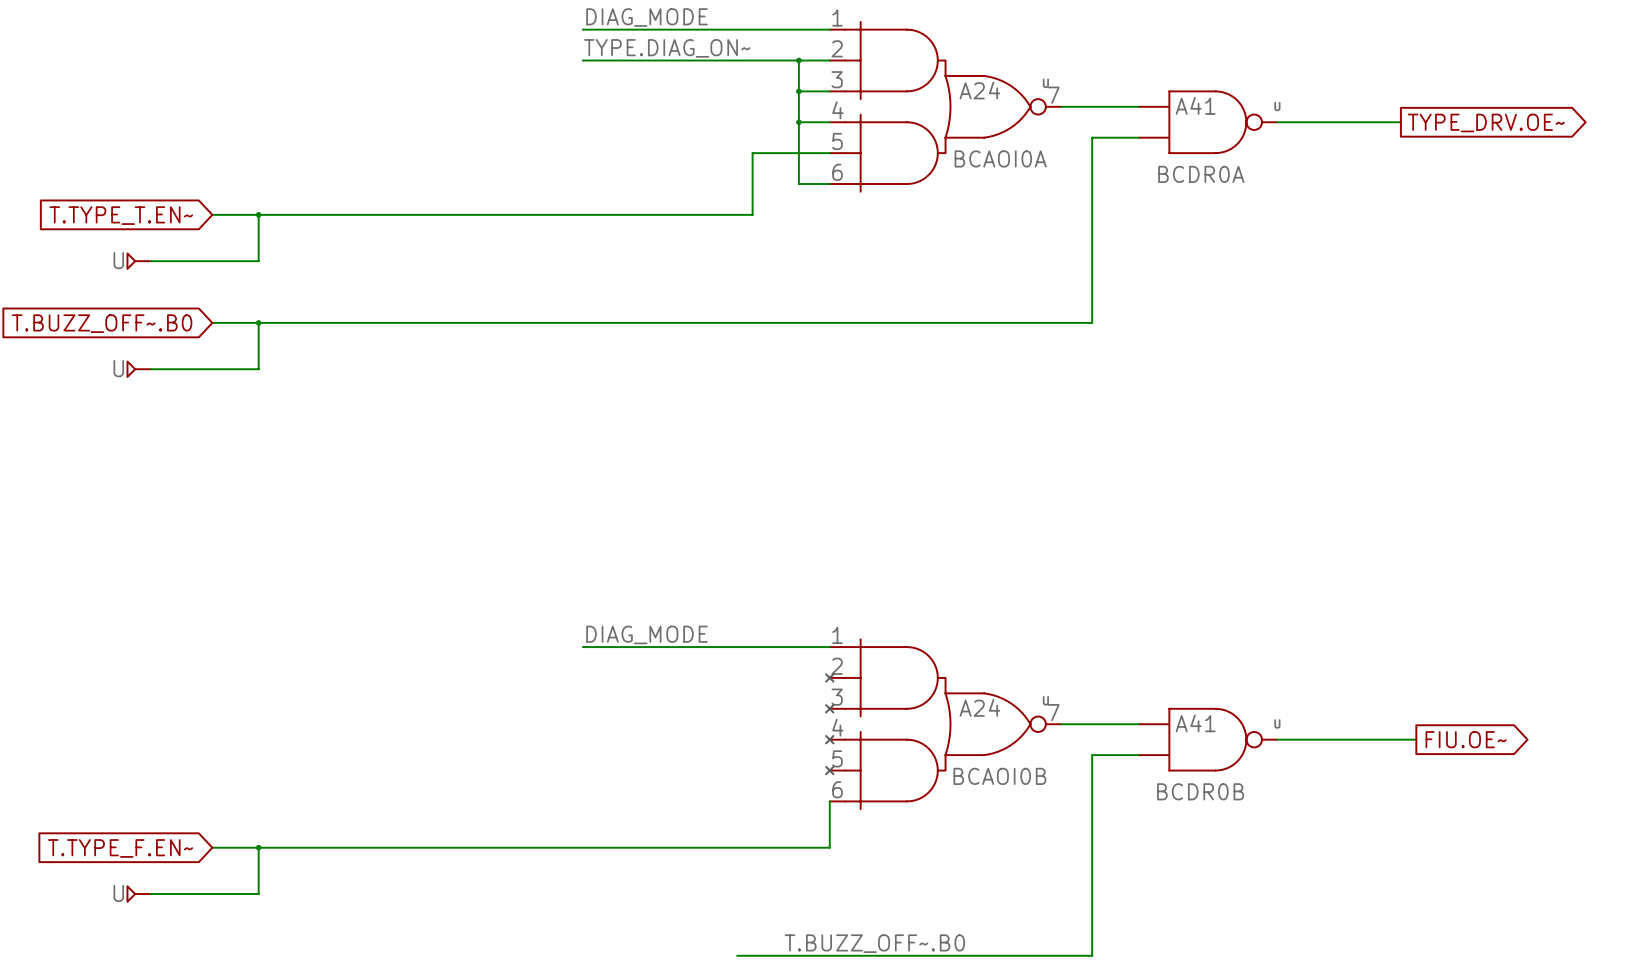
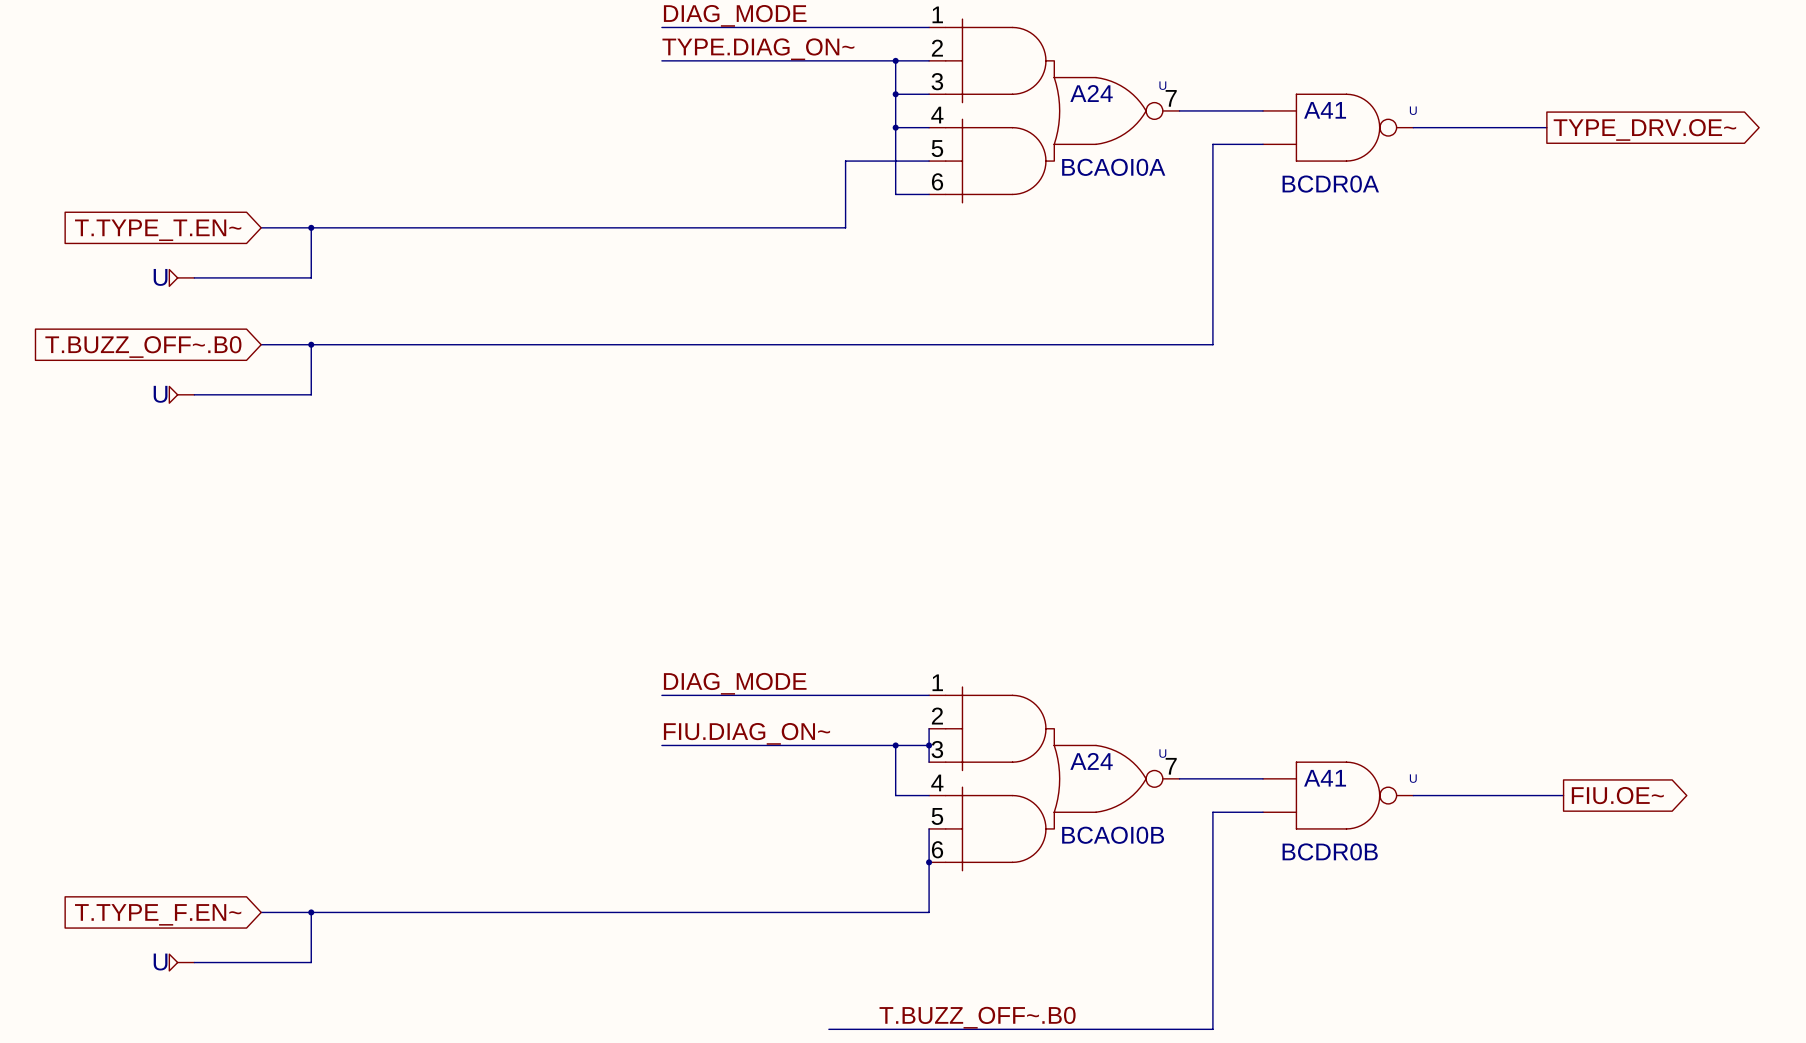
wire: none -> (929, 728) (929, 762)
no-connect mark: (829, 677) -> none
label: none -> FIU.DIAG_ON~ (746, 733)
wire: none -> (661, 745) (929, 745)
wire: none -> (895, 745) (895, 795) (929, 795)
junction: none -> (895, 745)
junction: none -> (929, 745)
no-connect mark: (829, 708) -> none
no-connect mark: (829, 739) -> none
wire: none -> (929, 828) (929, 862)
no-connect mark: (829, 770) -> none
junction: none -> (929, 862)

